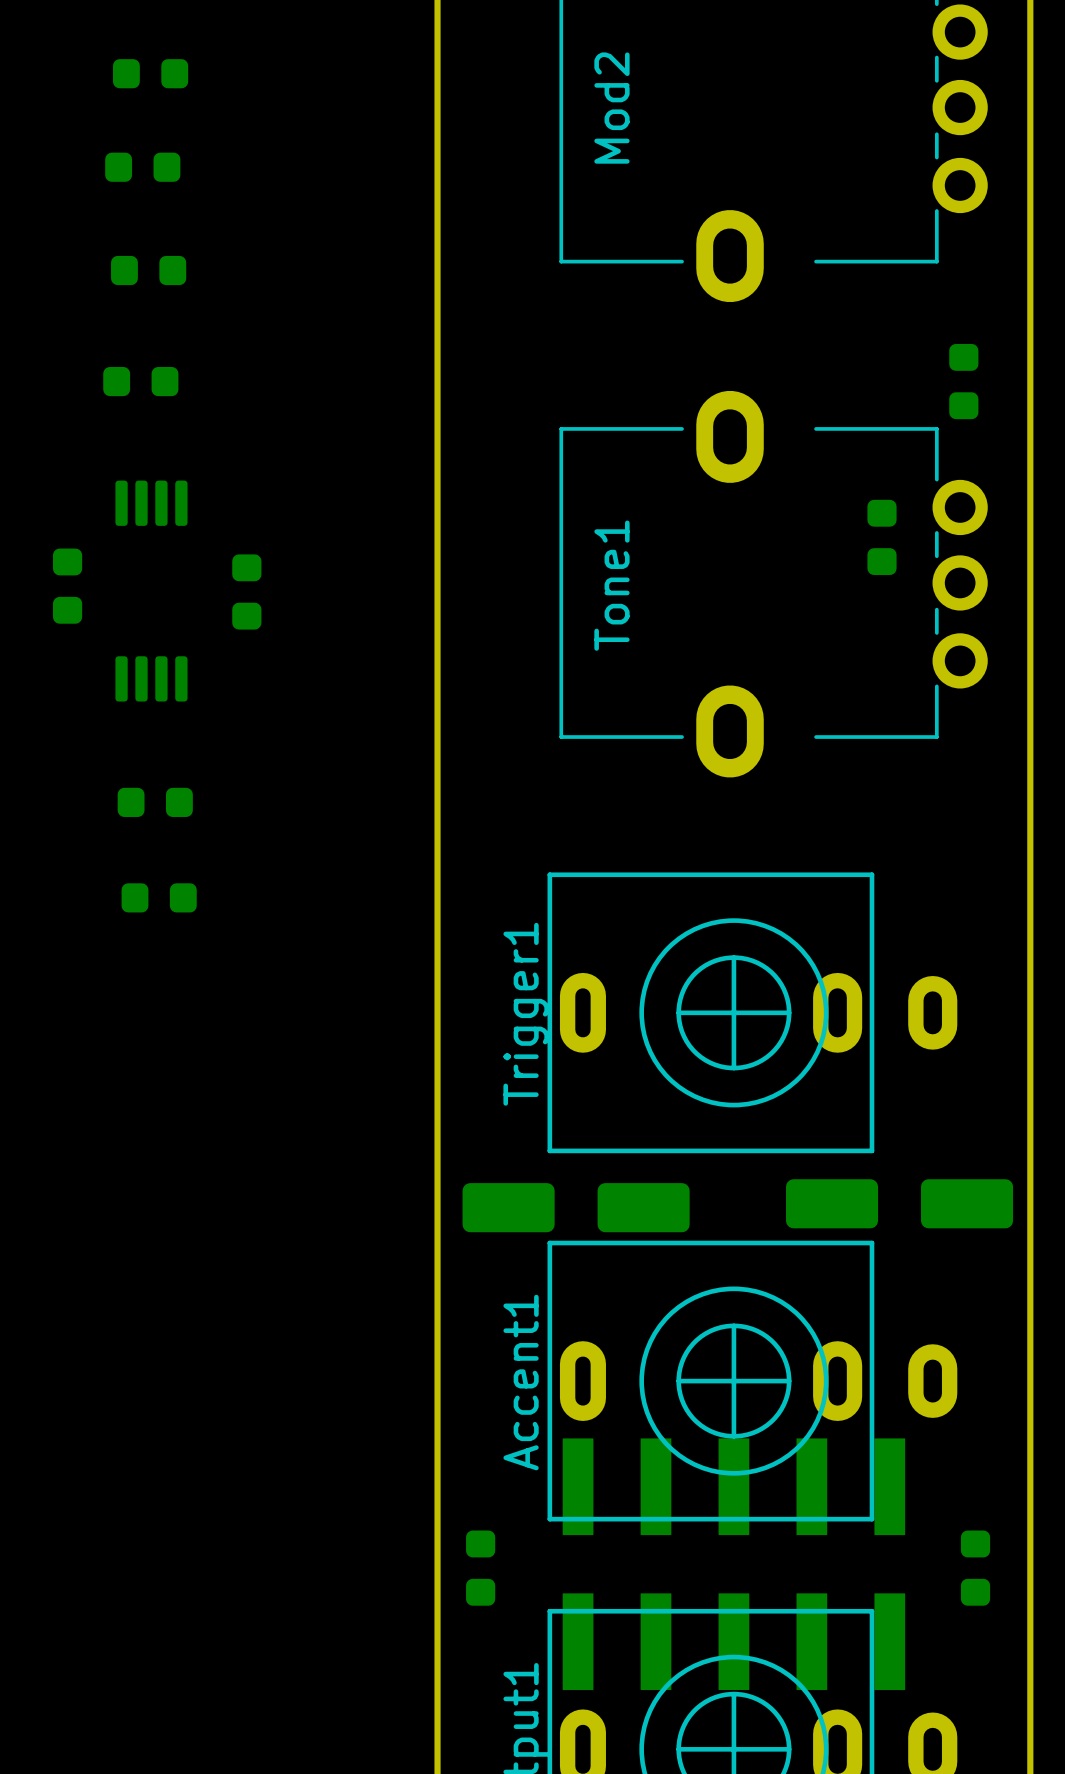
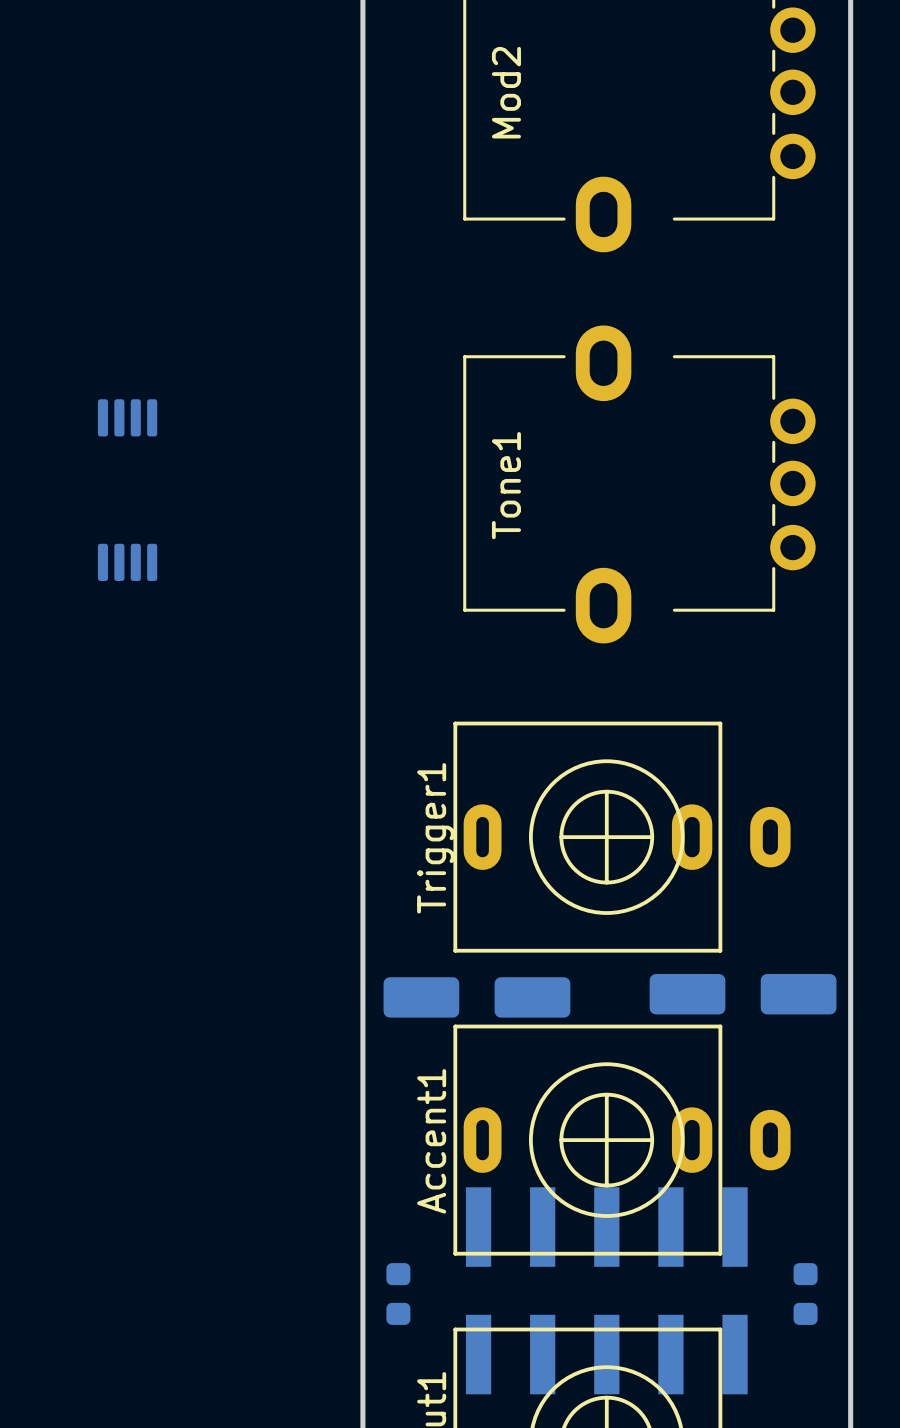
part: (150, 73) -> none
part: (142, 167) -> none
part: (148, 270) -> none
part: (140, 381) -> none
part: (963, 381) -> none
part: (882, 537) -> none
part: (67, 586) -> none
part: (246, 591) -> none
part: (155, 802) -> none
part: (159, 897) -> none

